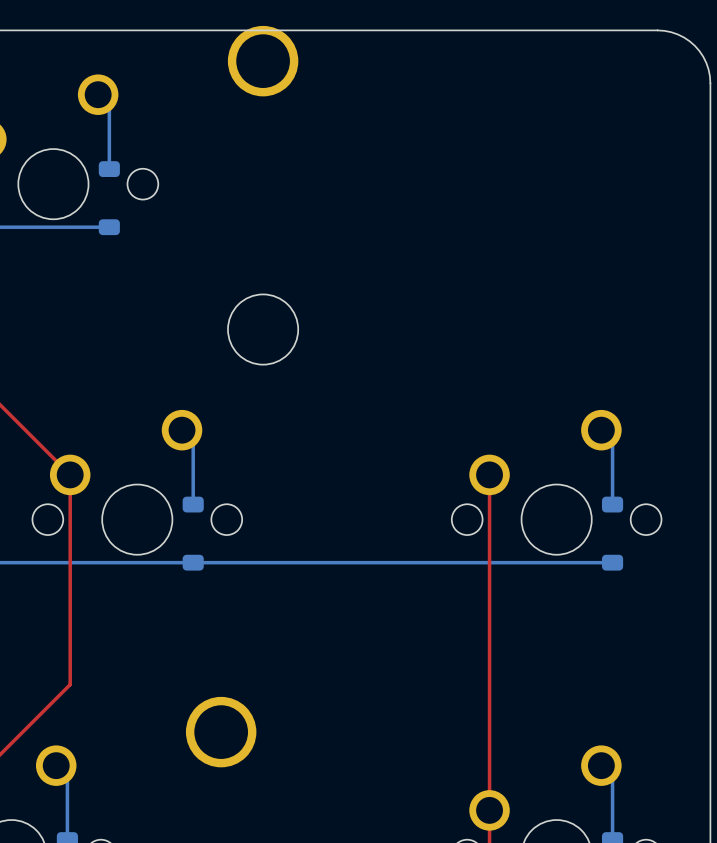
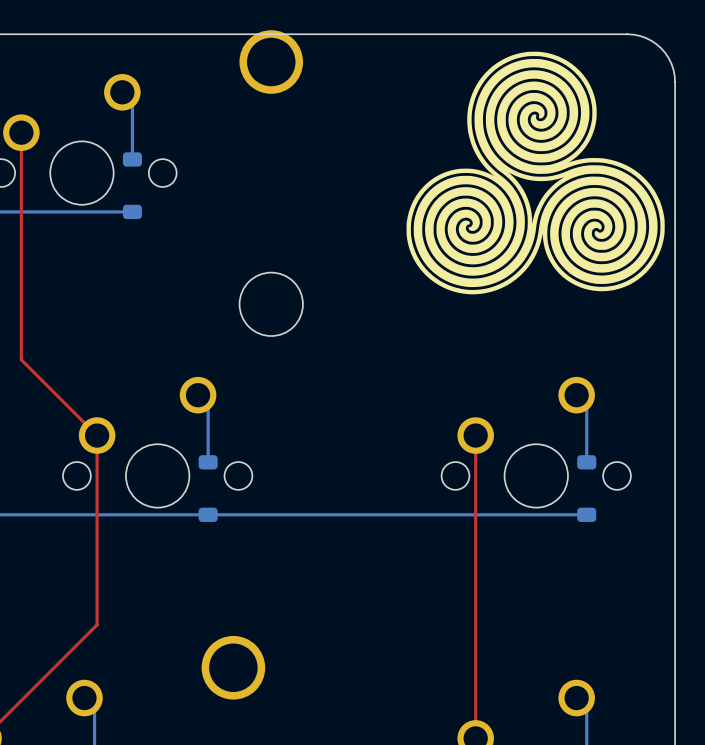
drawing: none -> [406, 51, 665, 295]

